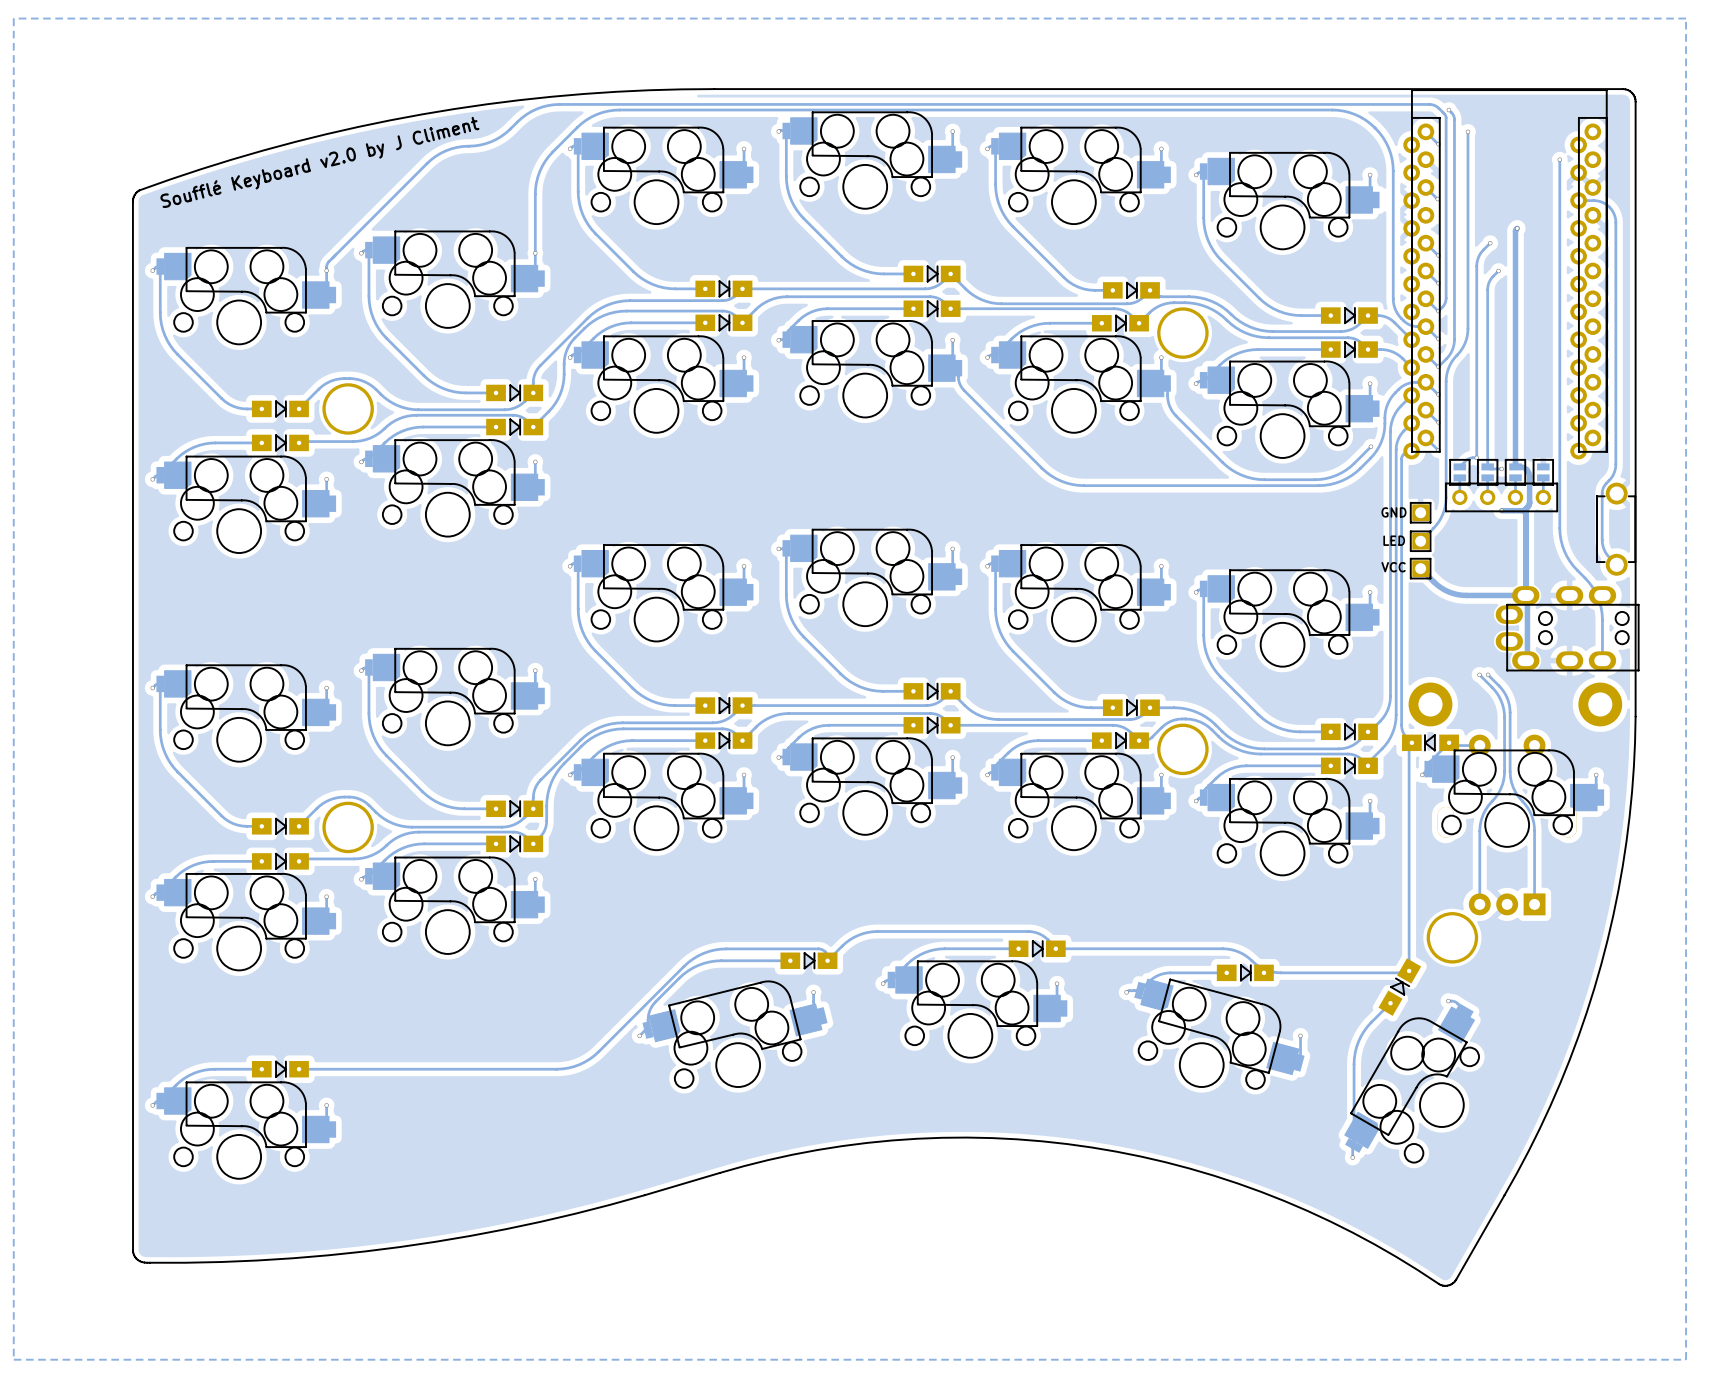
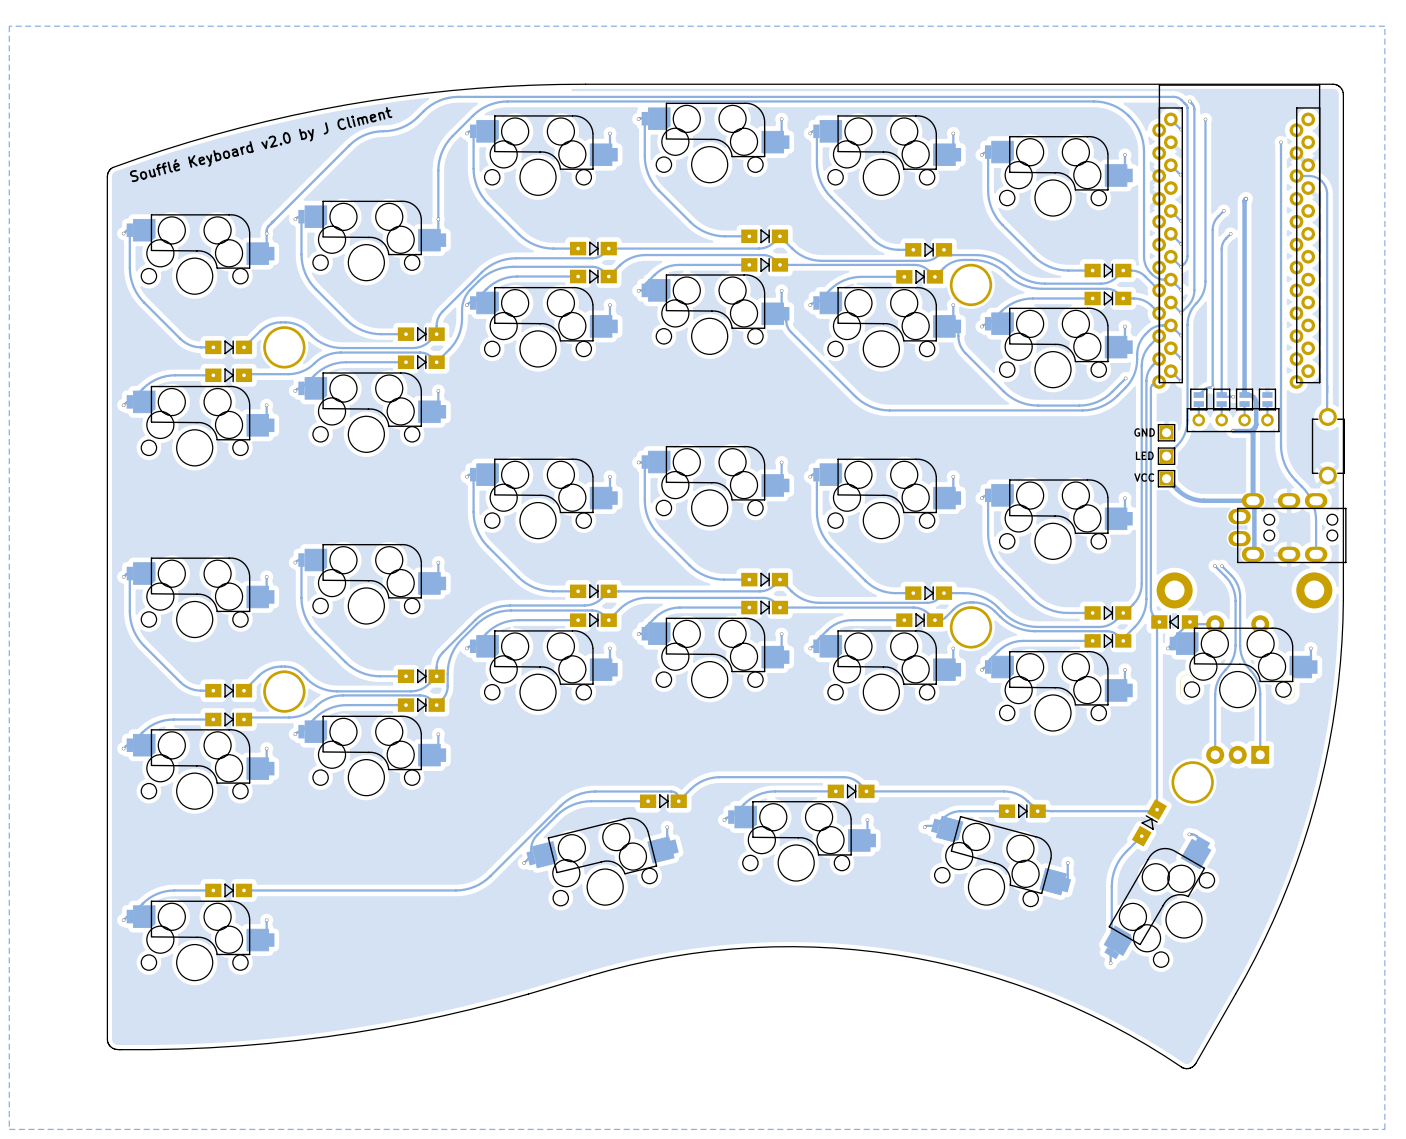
track: (1615, 464) (1613, 475) (1602, 490) (1602, 540) (1605, 552) (1616, 564) -> (1327, 392) (1327, 416)
part rotation: 0° (1616, 529) -> 180° (1328, 446)

